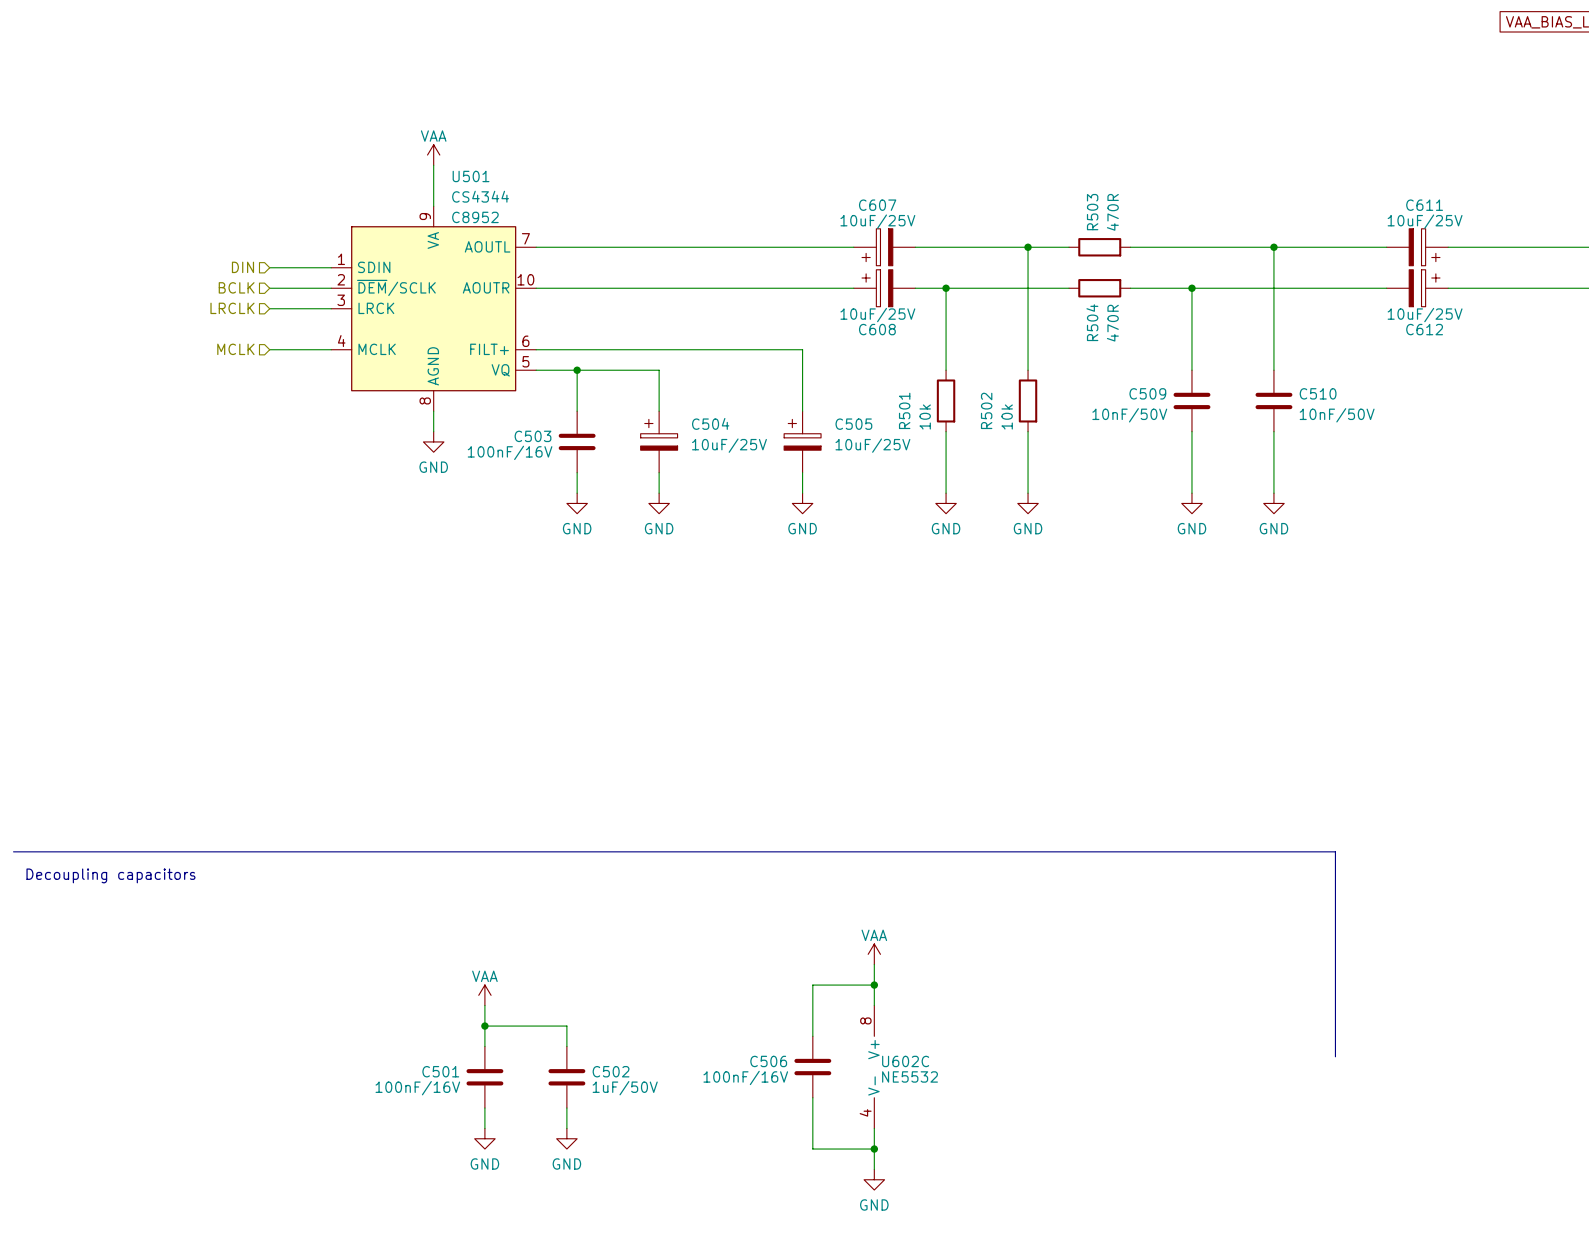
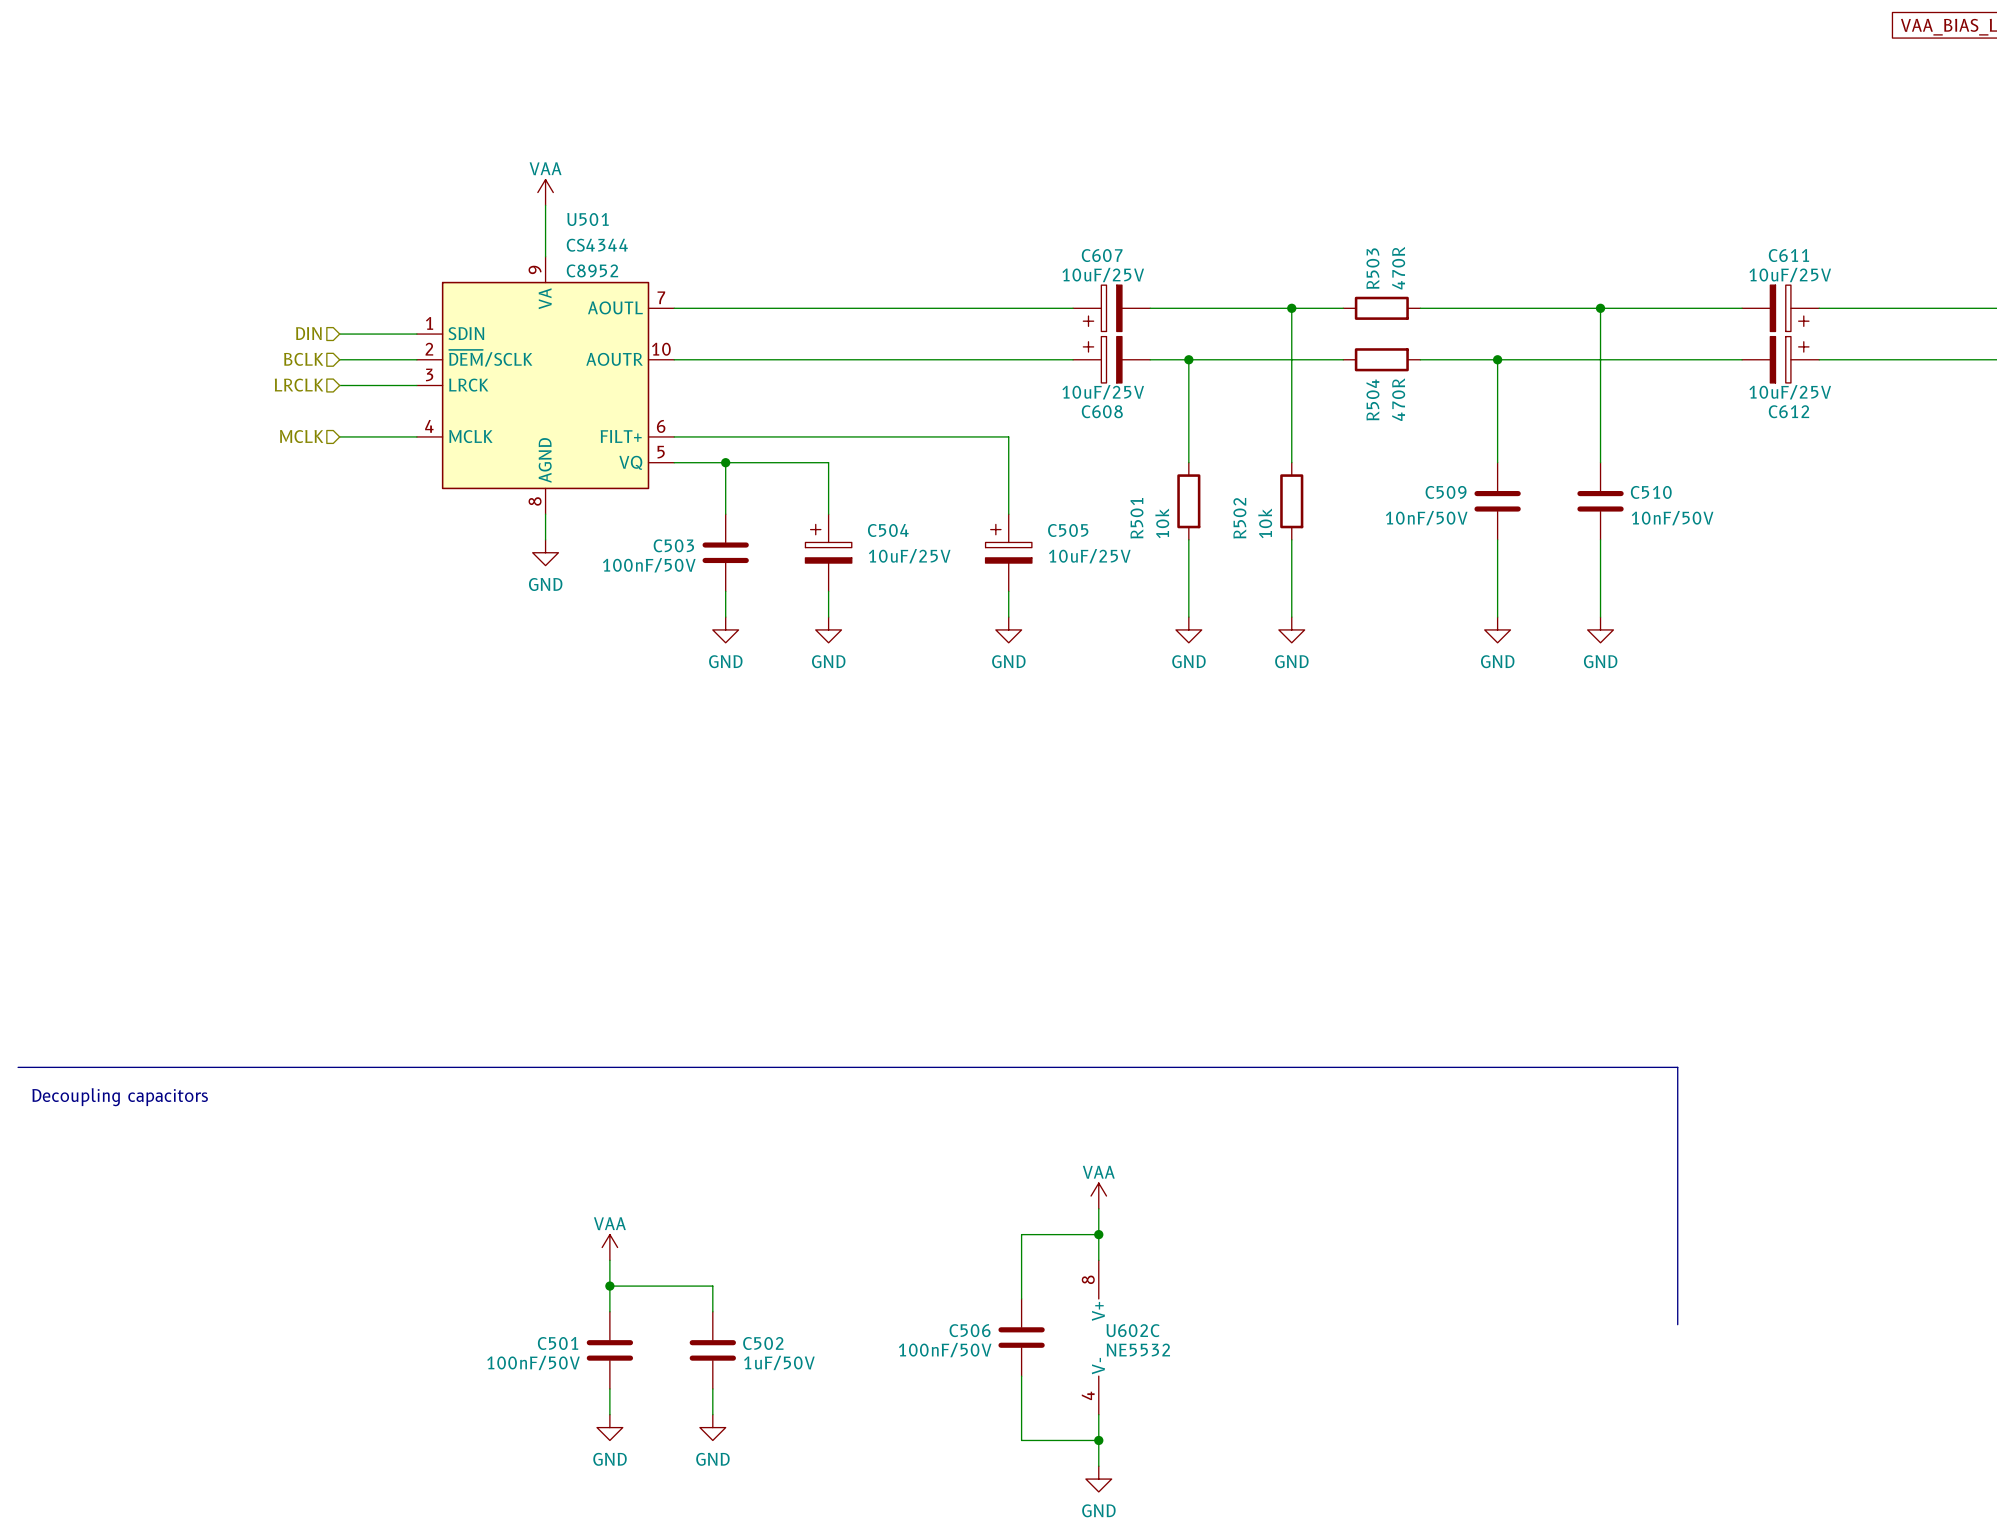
C503 value: 100nF/16V (510, 452) -> 100nF/50V (649, 565)
C506 value: 100nF/16V (745, 1077) -> 100nF/50V (945, 1350)
C501 value: 100nF/16V (417, 1088) -> 100nF/50V (533, 1362)

